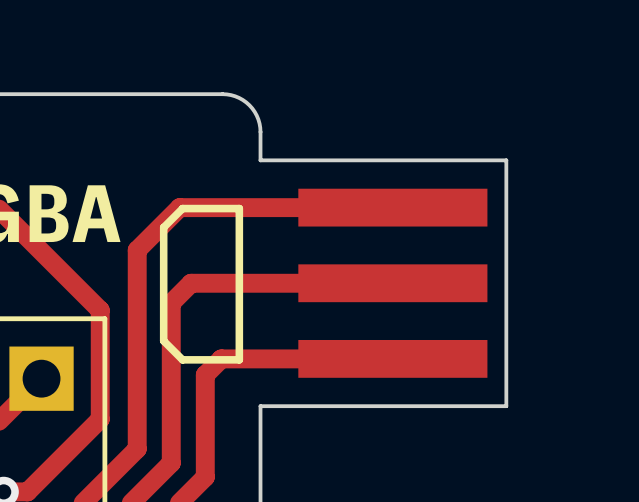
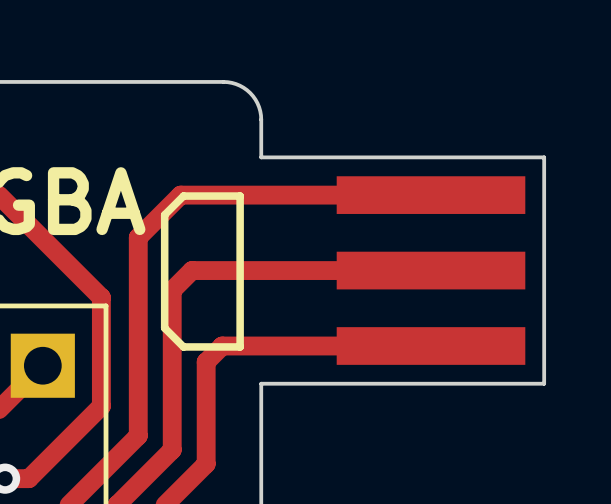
board edge: (260, 160) (506, 160) (506, 406) (260, 406) -> (261, 147) (261, 157) (544, 157) (544, 383) (261, 383) (261, 393)
part position: (392, 283) -> (431, 270)

